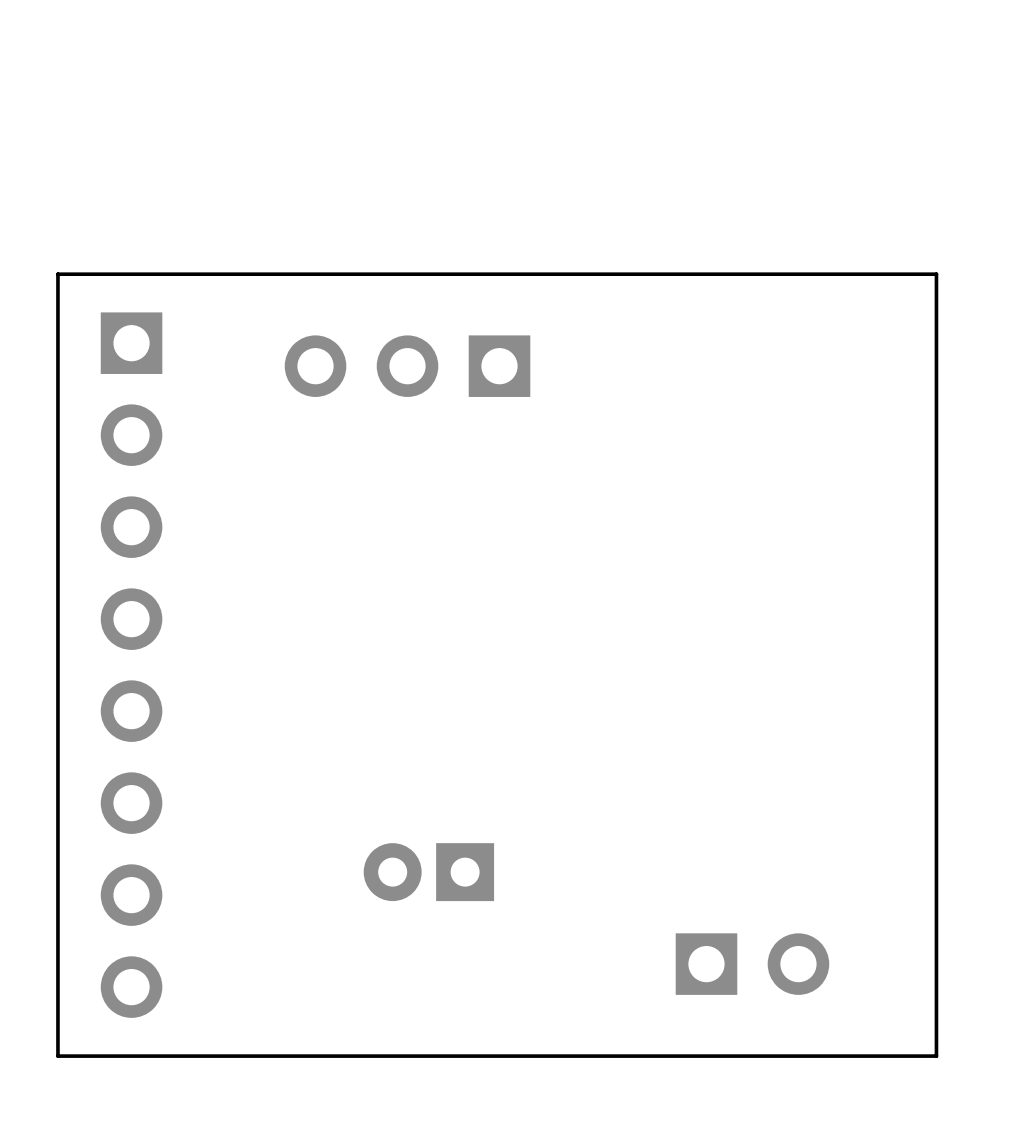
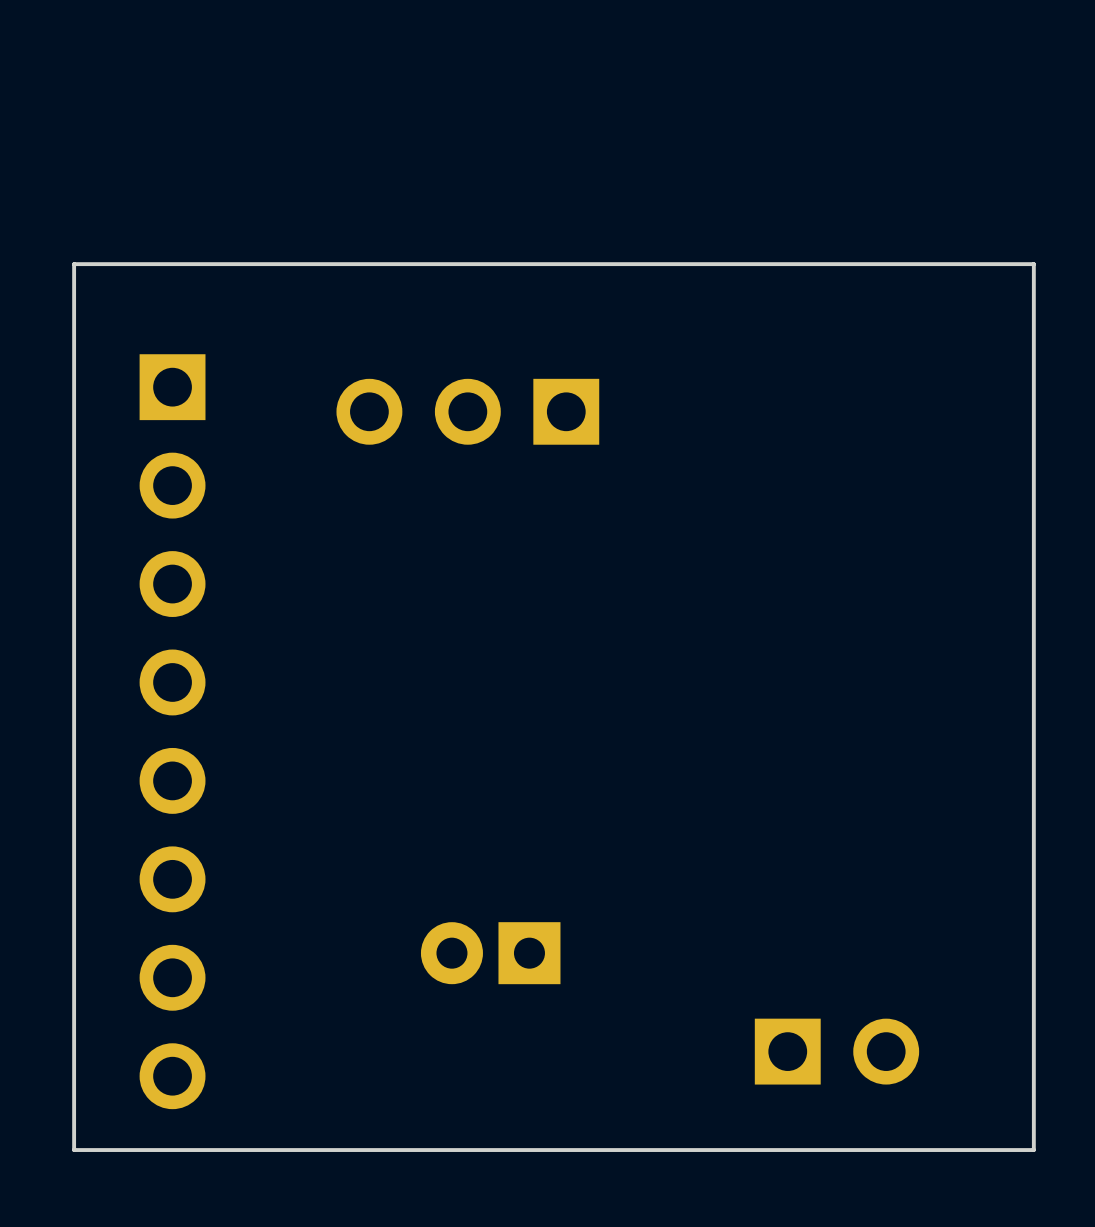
board edge: (936, 274) (57, 274) (57, 1056) -> (1033, 313) (1033, 264) (74, 264) (74, 1150) (93, 1150)

